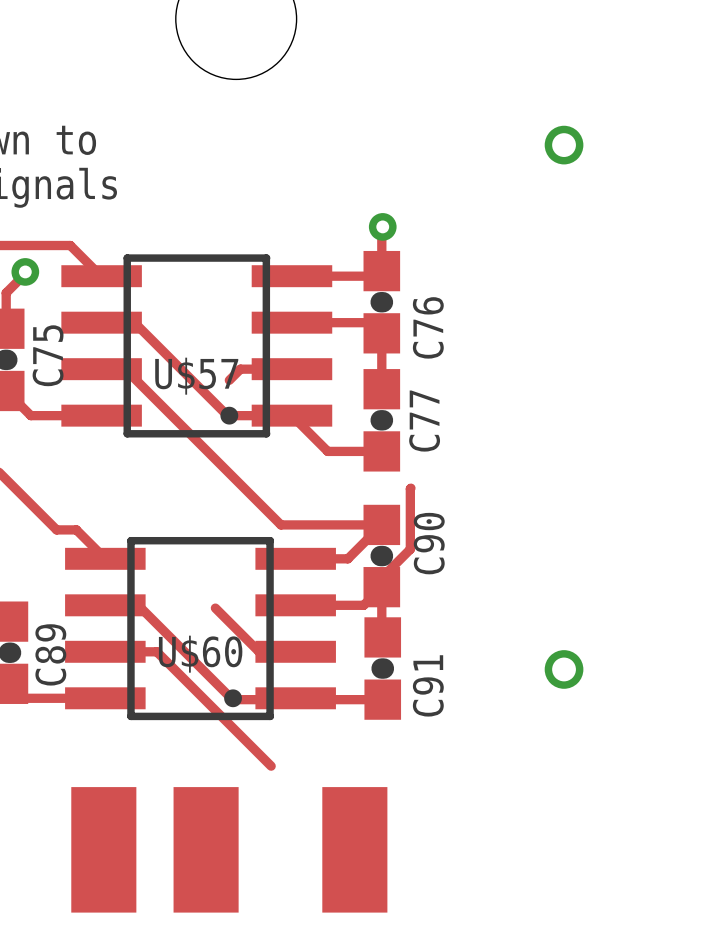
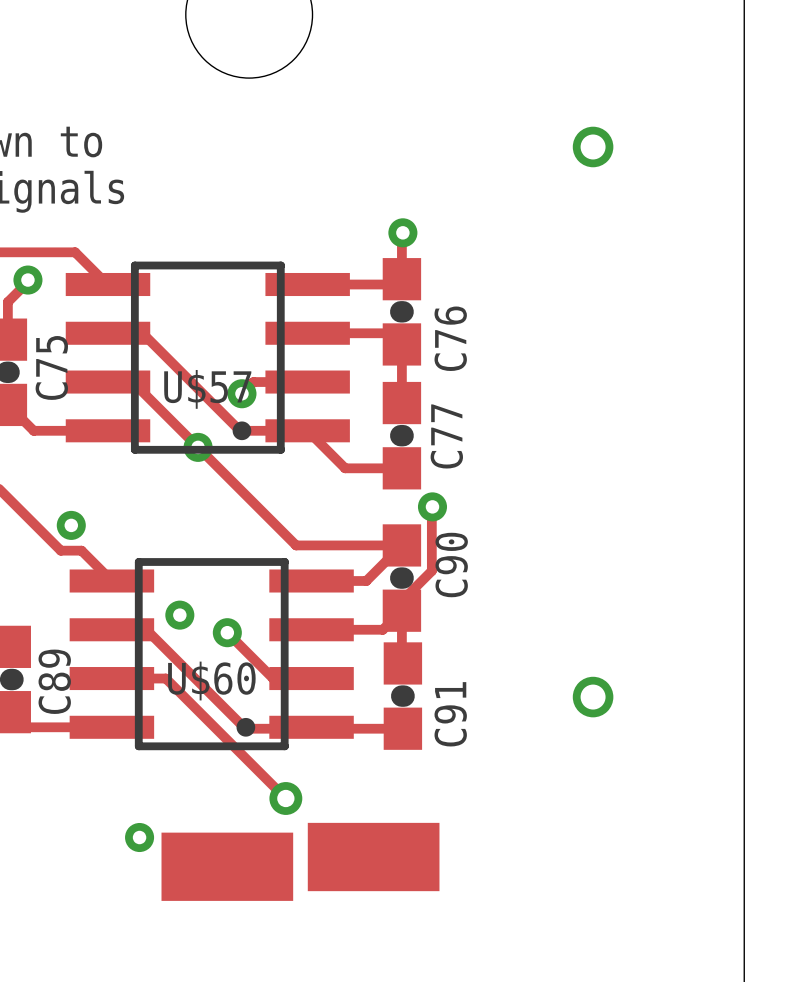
via: none -> (241, 393)
via: none -> (198, 447)
via: none -> (432, 506)
via: none -> (71, 525)
via: none -> (179, 615)
via: none -> (227, 632)
via: none -> (285, 798)
via: none -> (139, 837)
part: (103, 849) -> none
part rotation: 0° (206, 849) -> 90° clockwise (227, 866)
part rotation: 0° (354, 849) -> 90° clockwise (373, 857)

